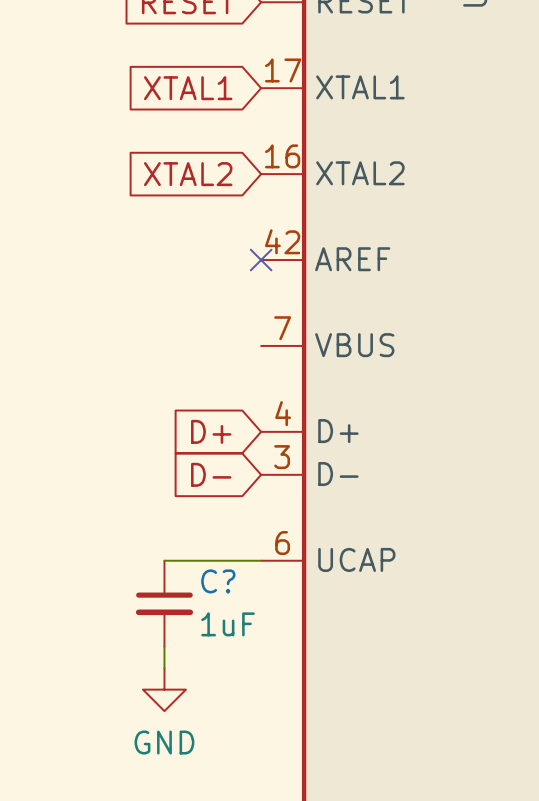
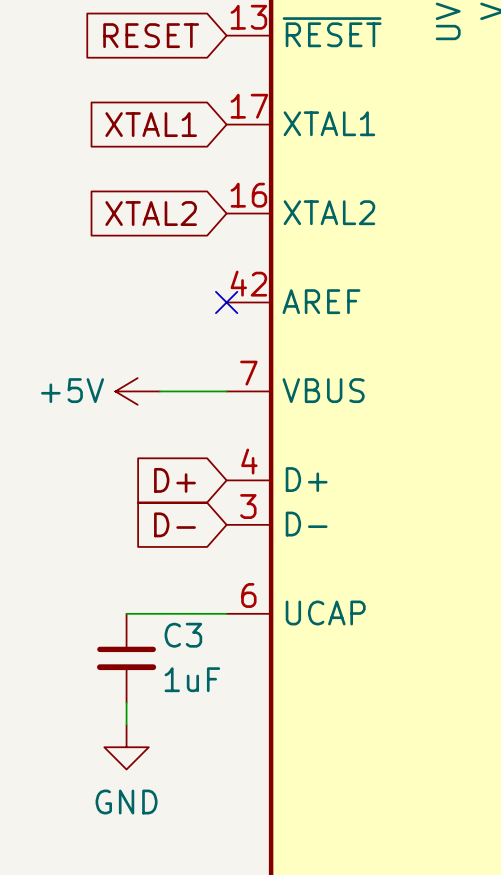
power symbol: none -> +5V (137, 391)
wire: none -> (159, 391) (226, 391)
C? name: C? (218, 581) -> C3 (183, 635)

